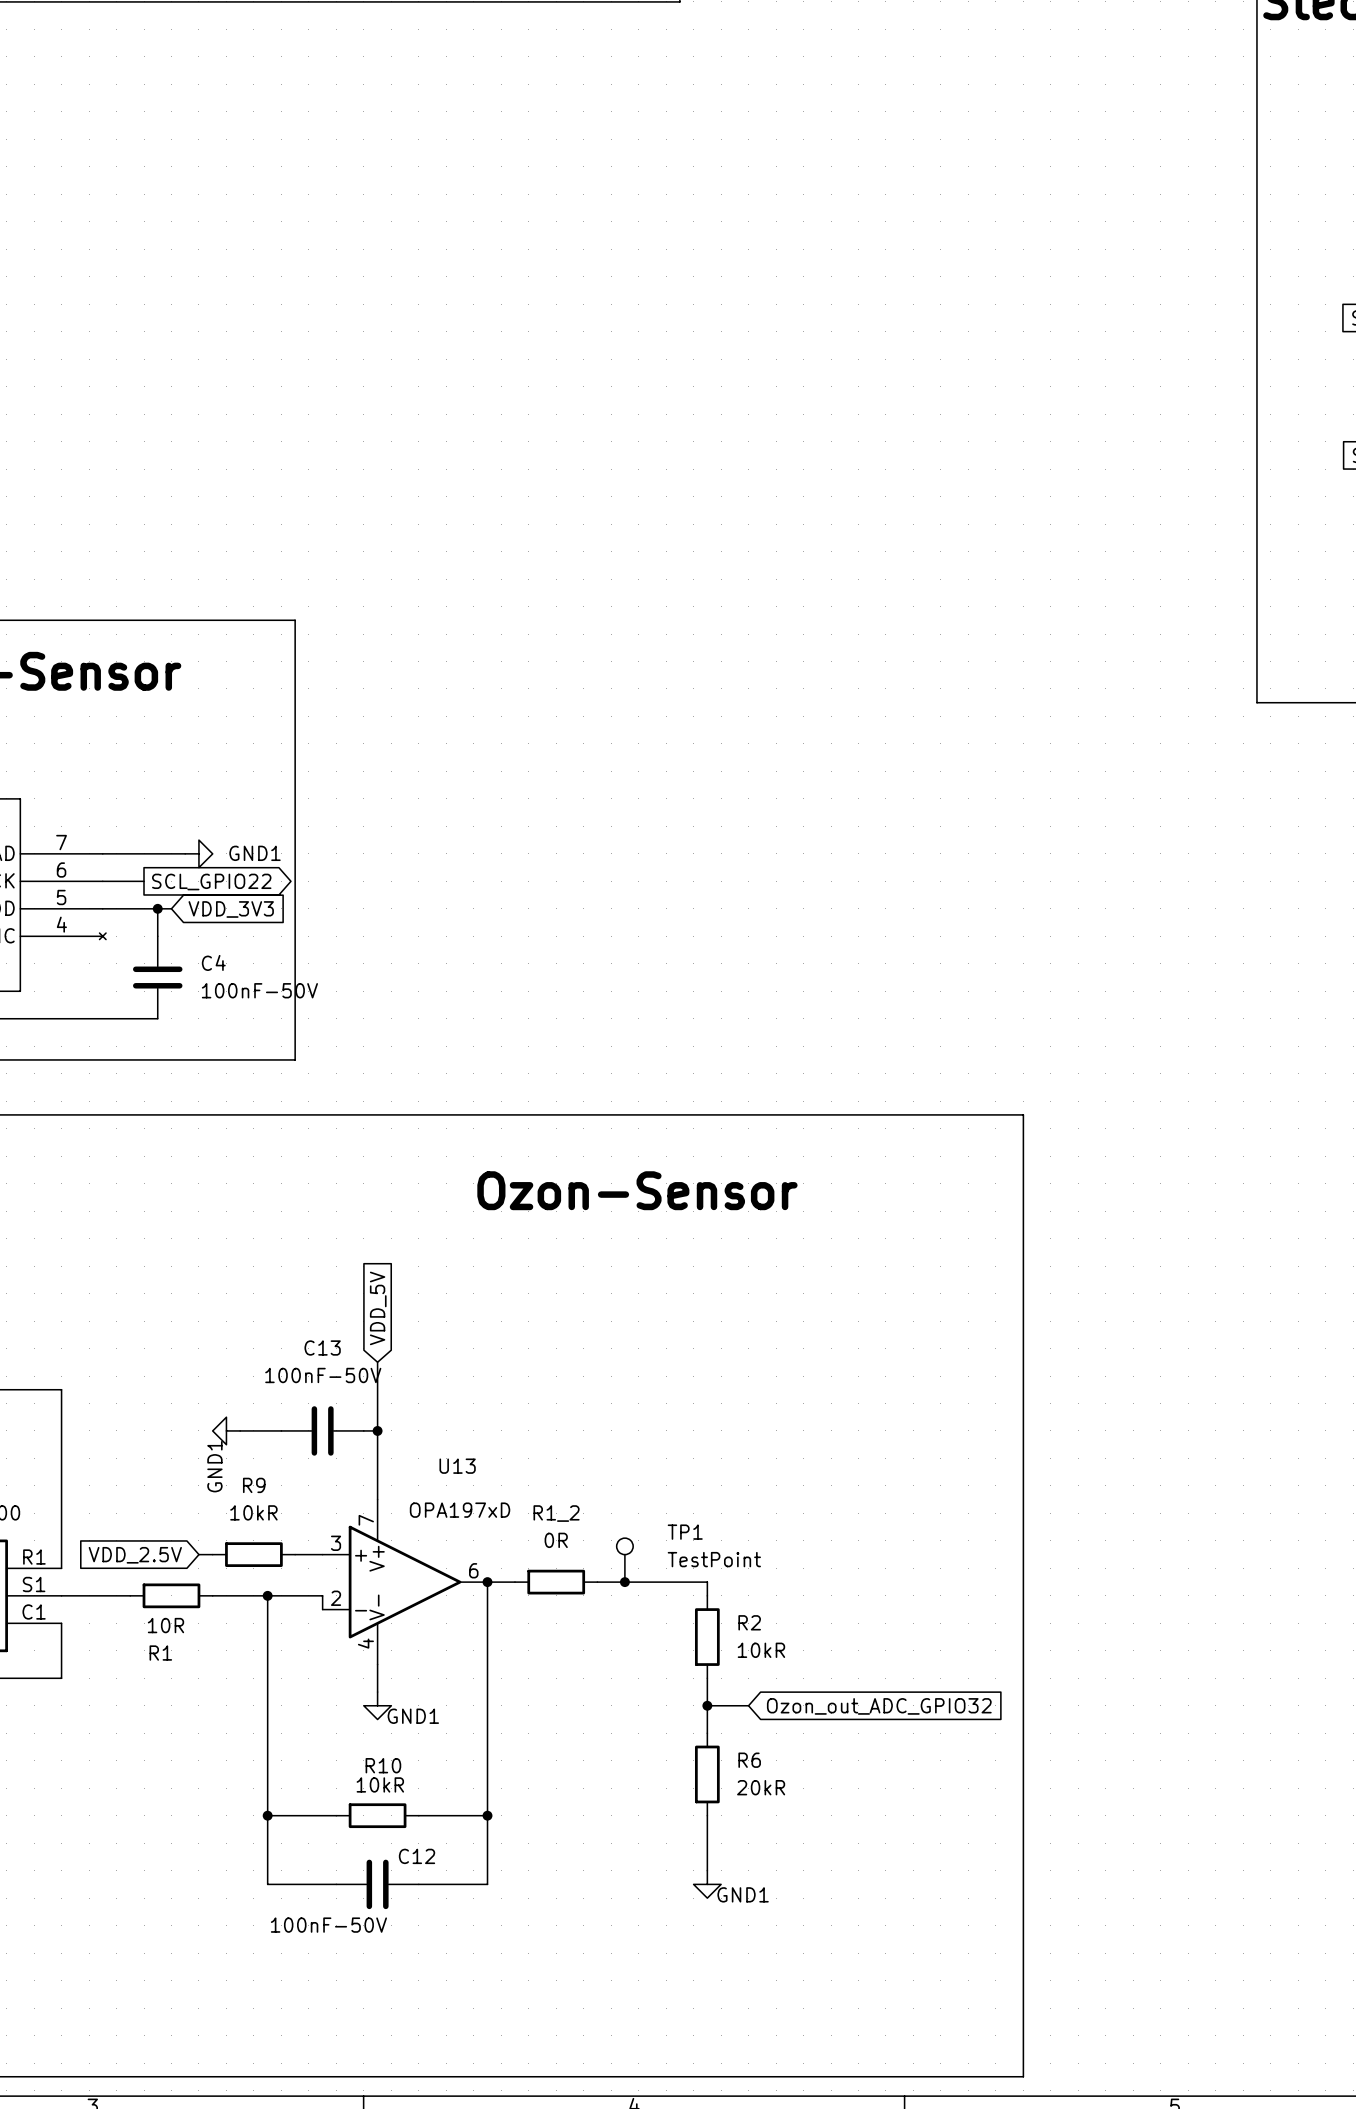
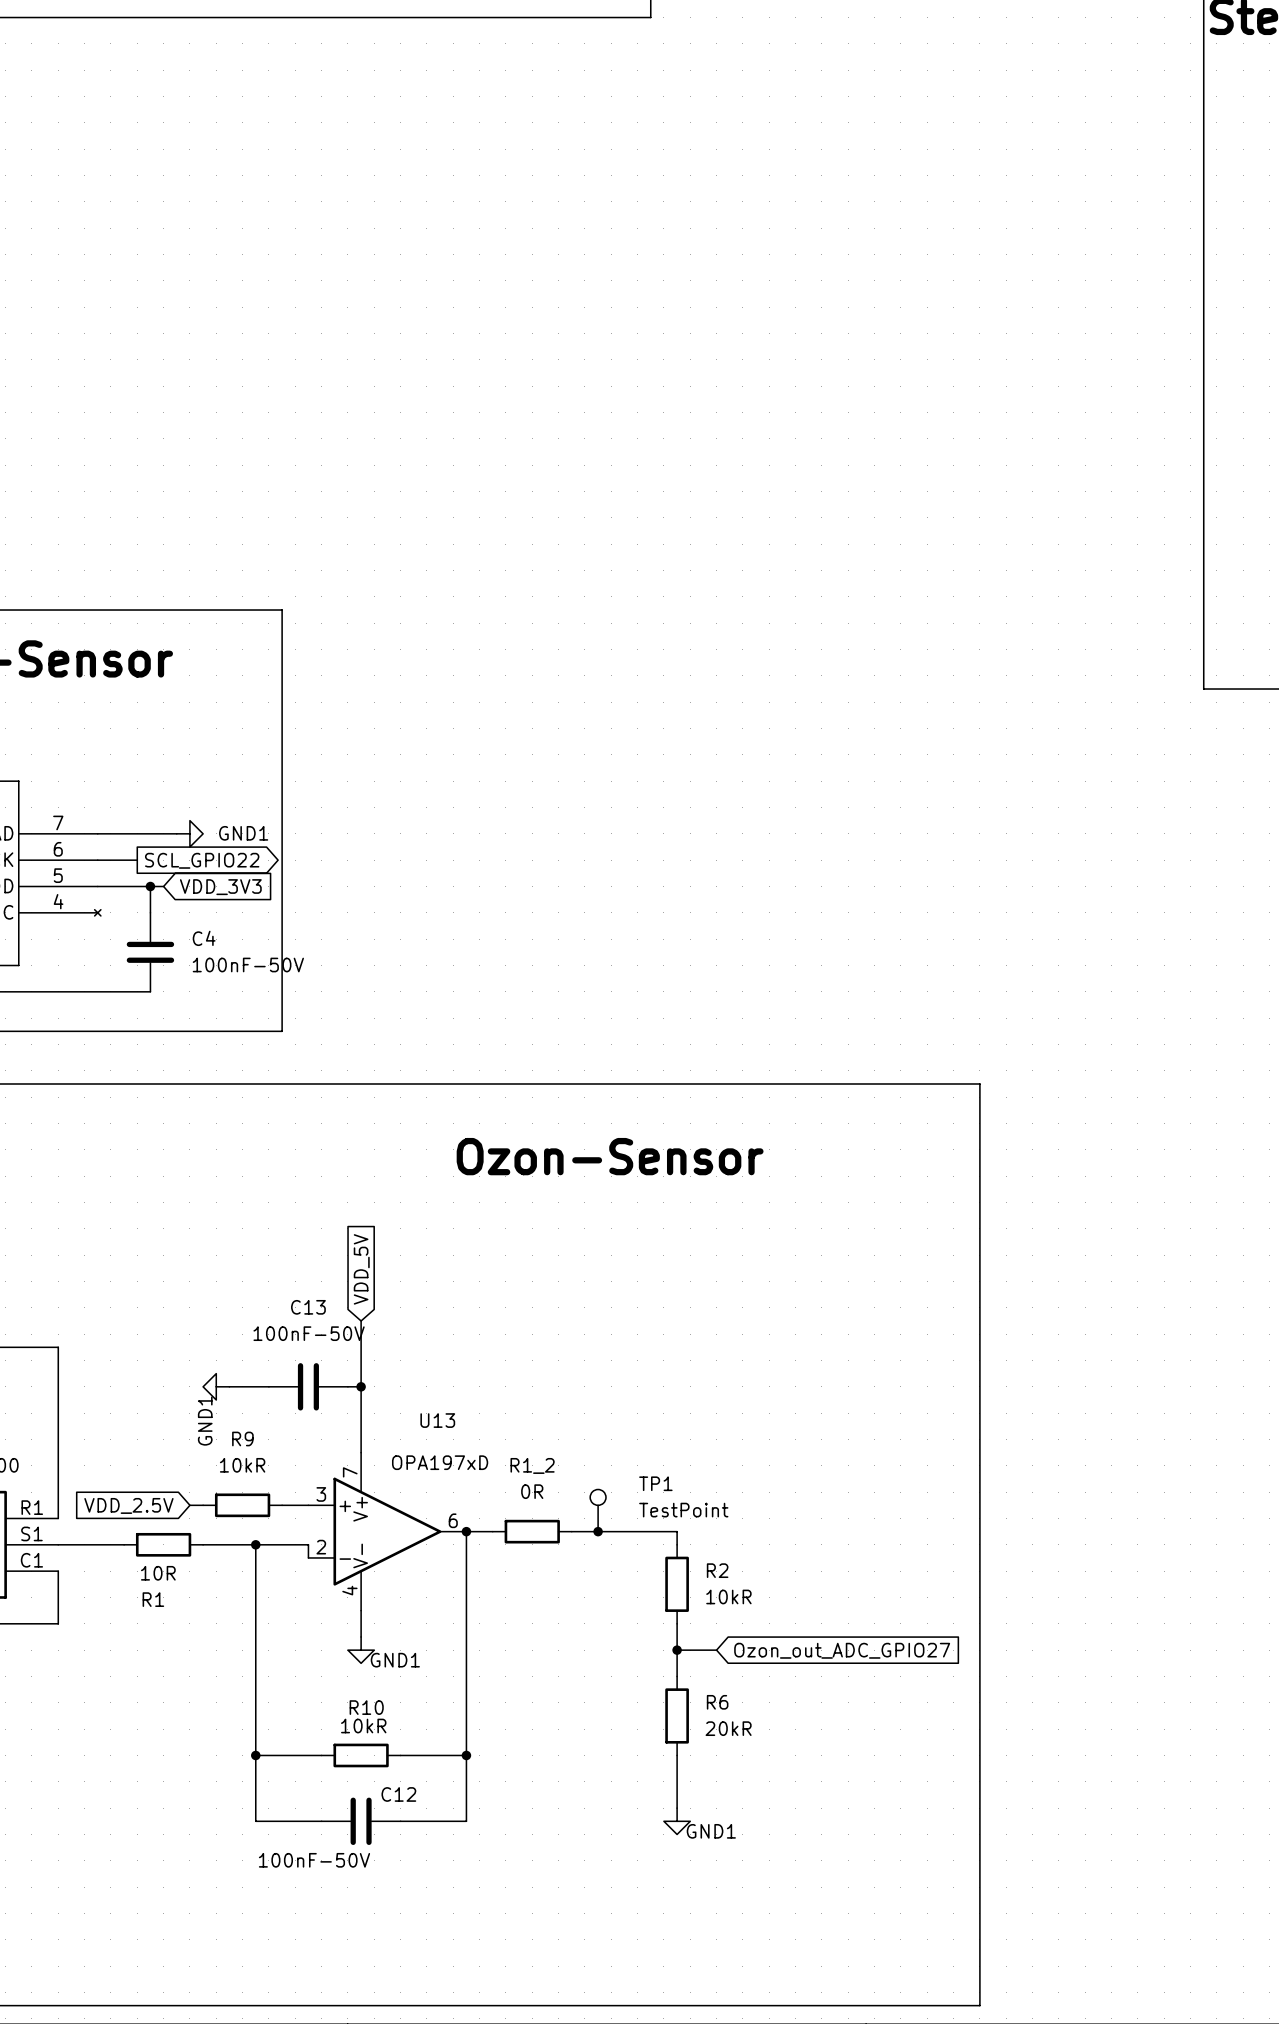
global label: Ozon_out_ADC_GPIO32 (879, 1706) -> Ozon_out_ADC_GPIO27 (842, 1650)

